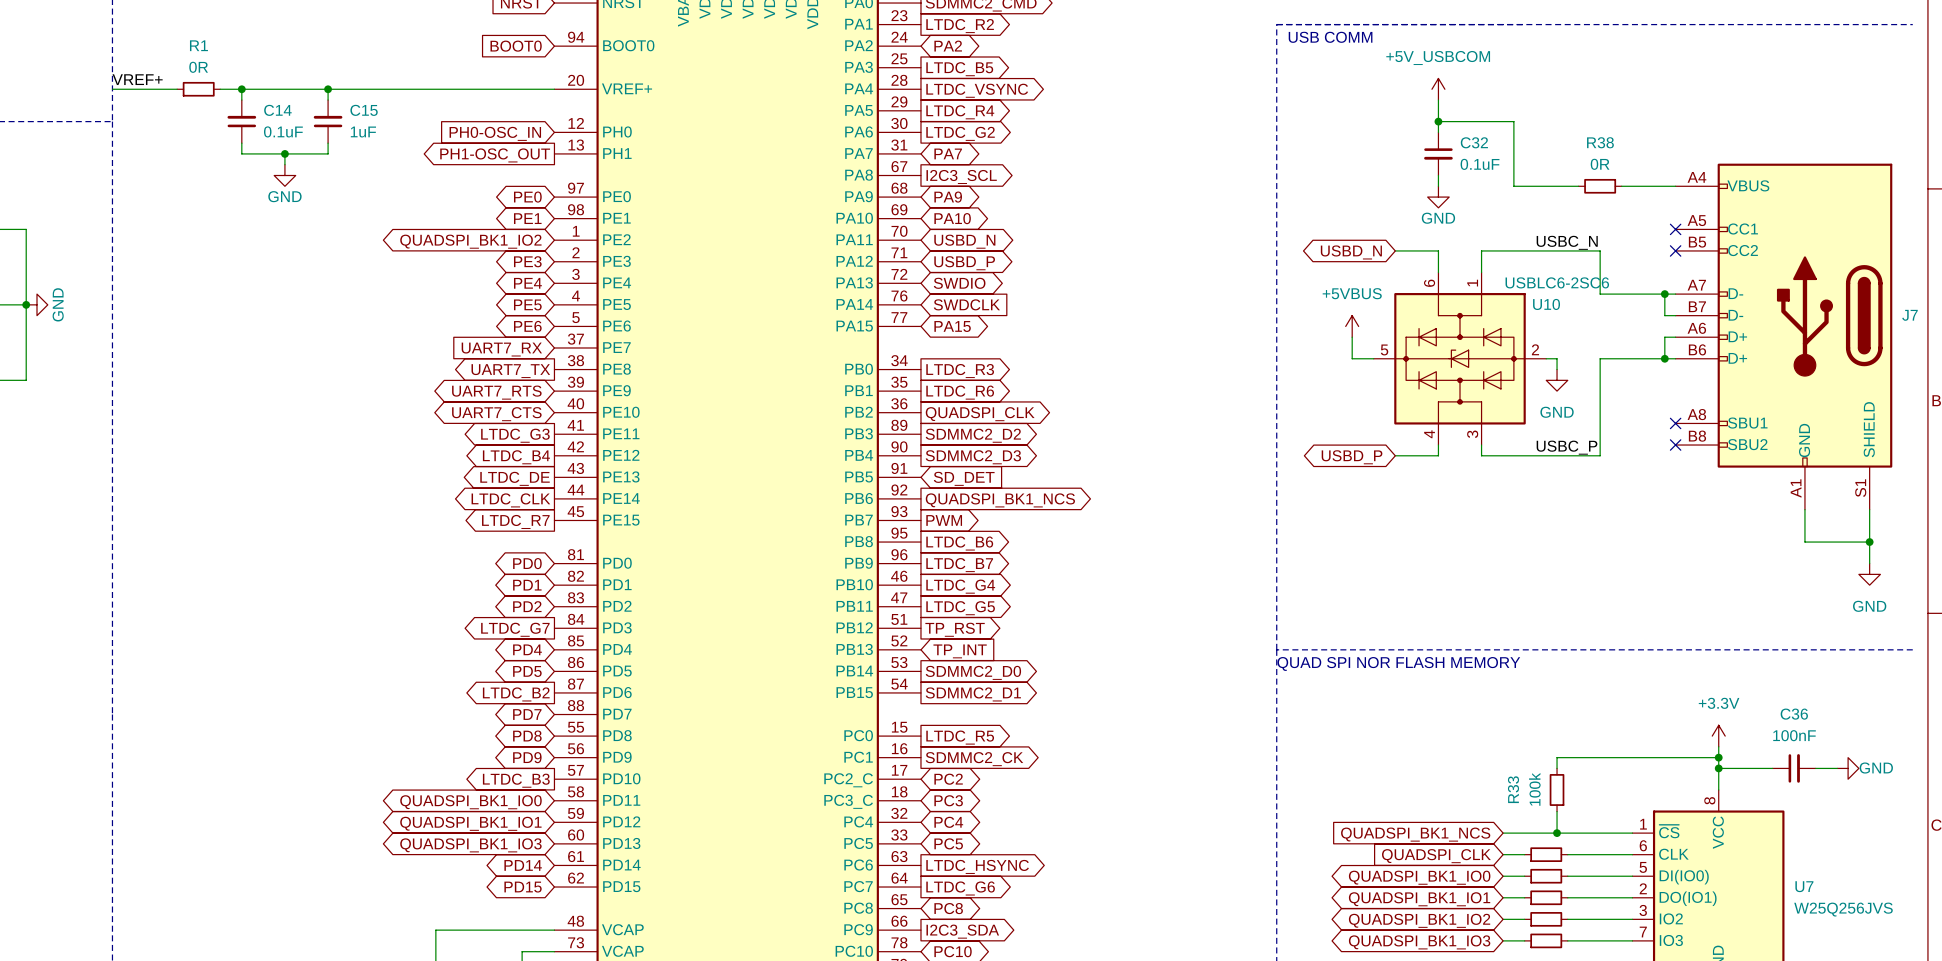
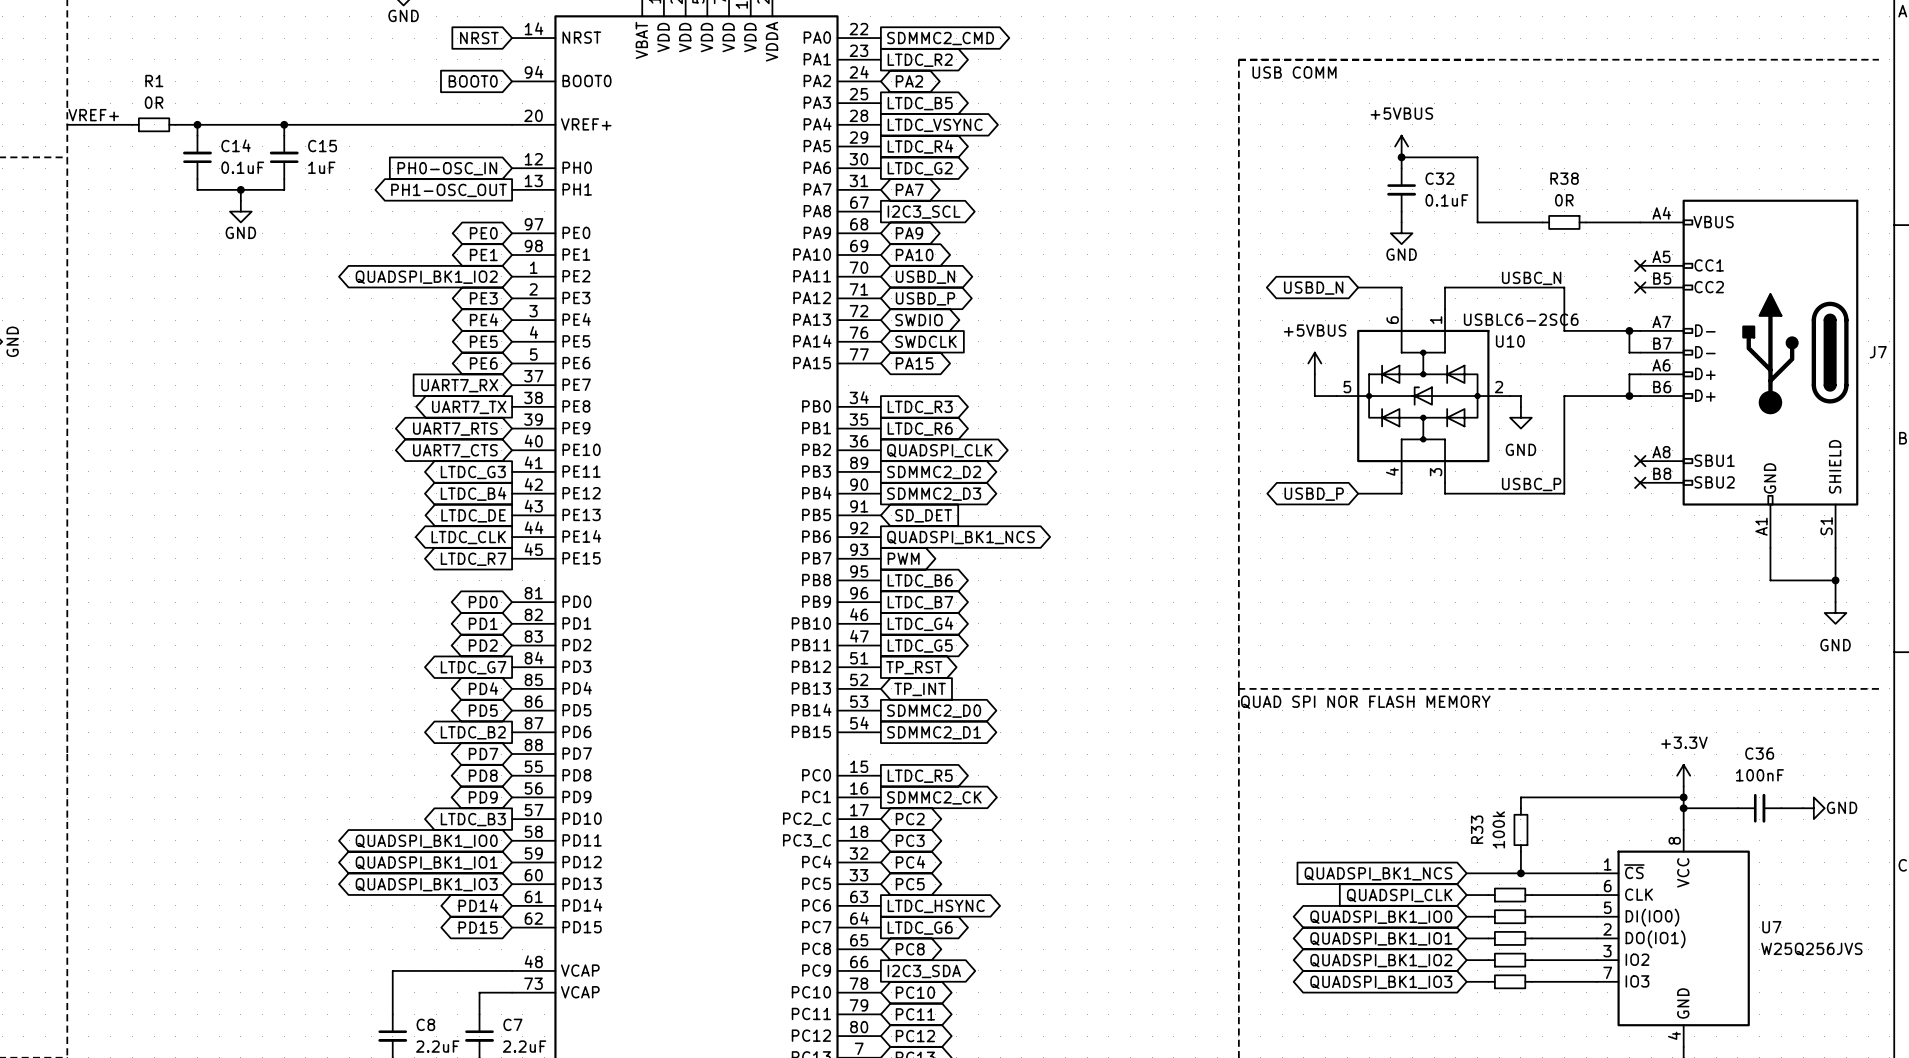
power symbol: +5V_USBCOM (1438, 89) -> none
power symbol: none -> +5VBUS (1401, 146)

